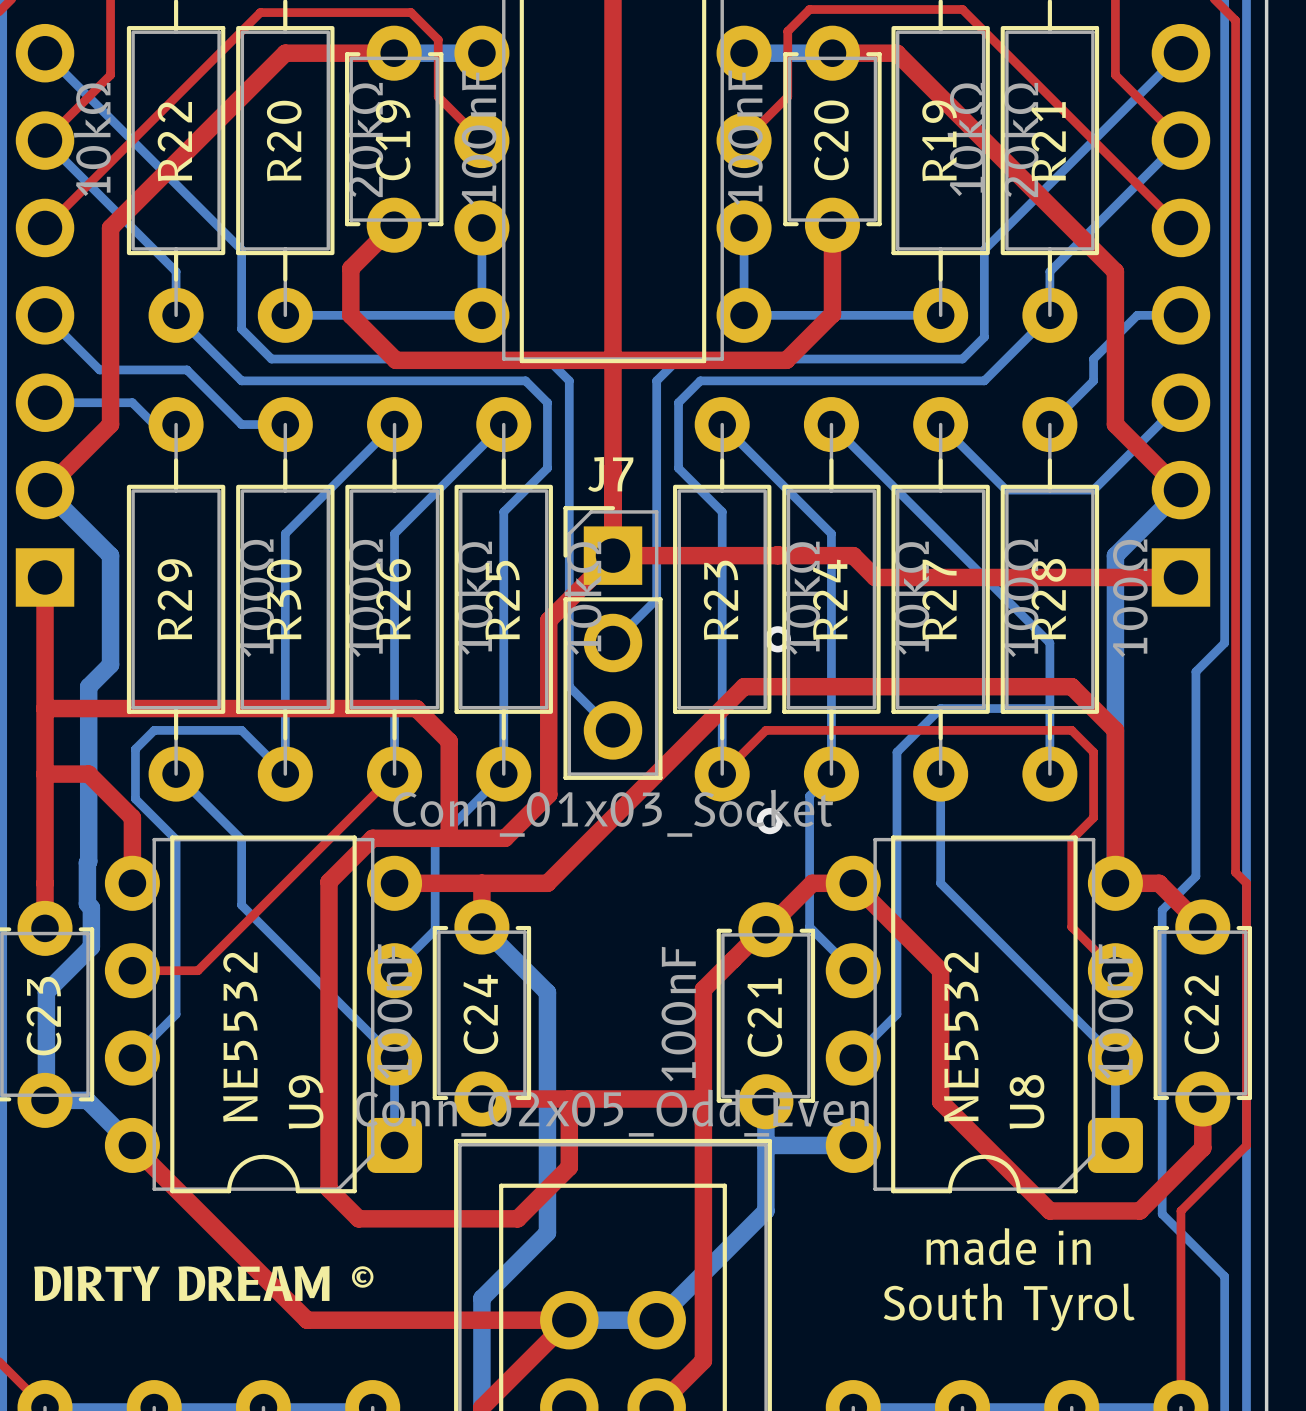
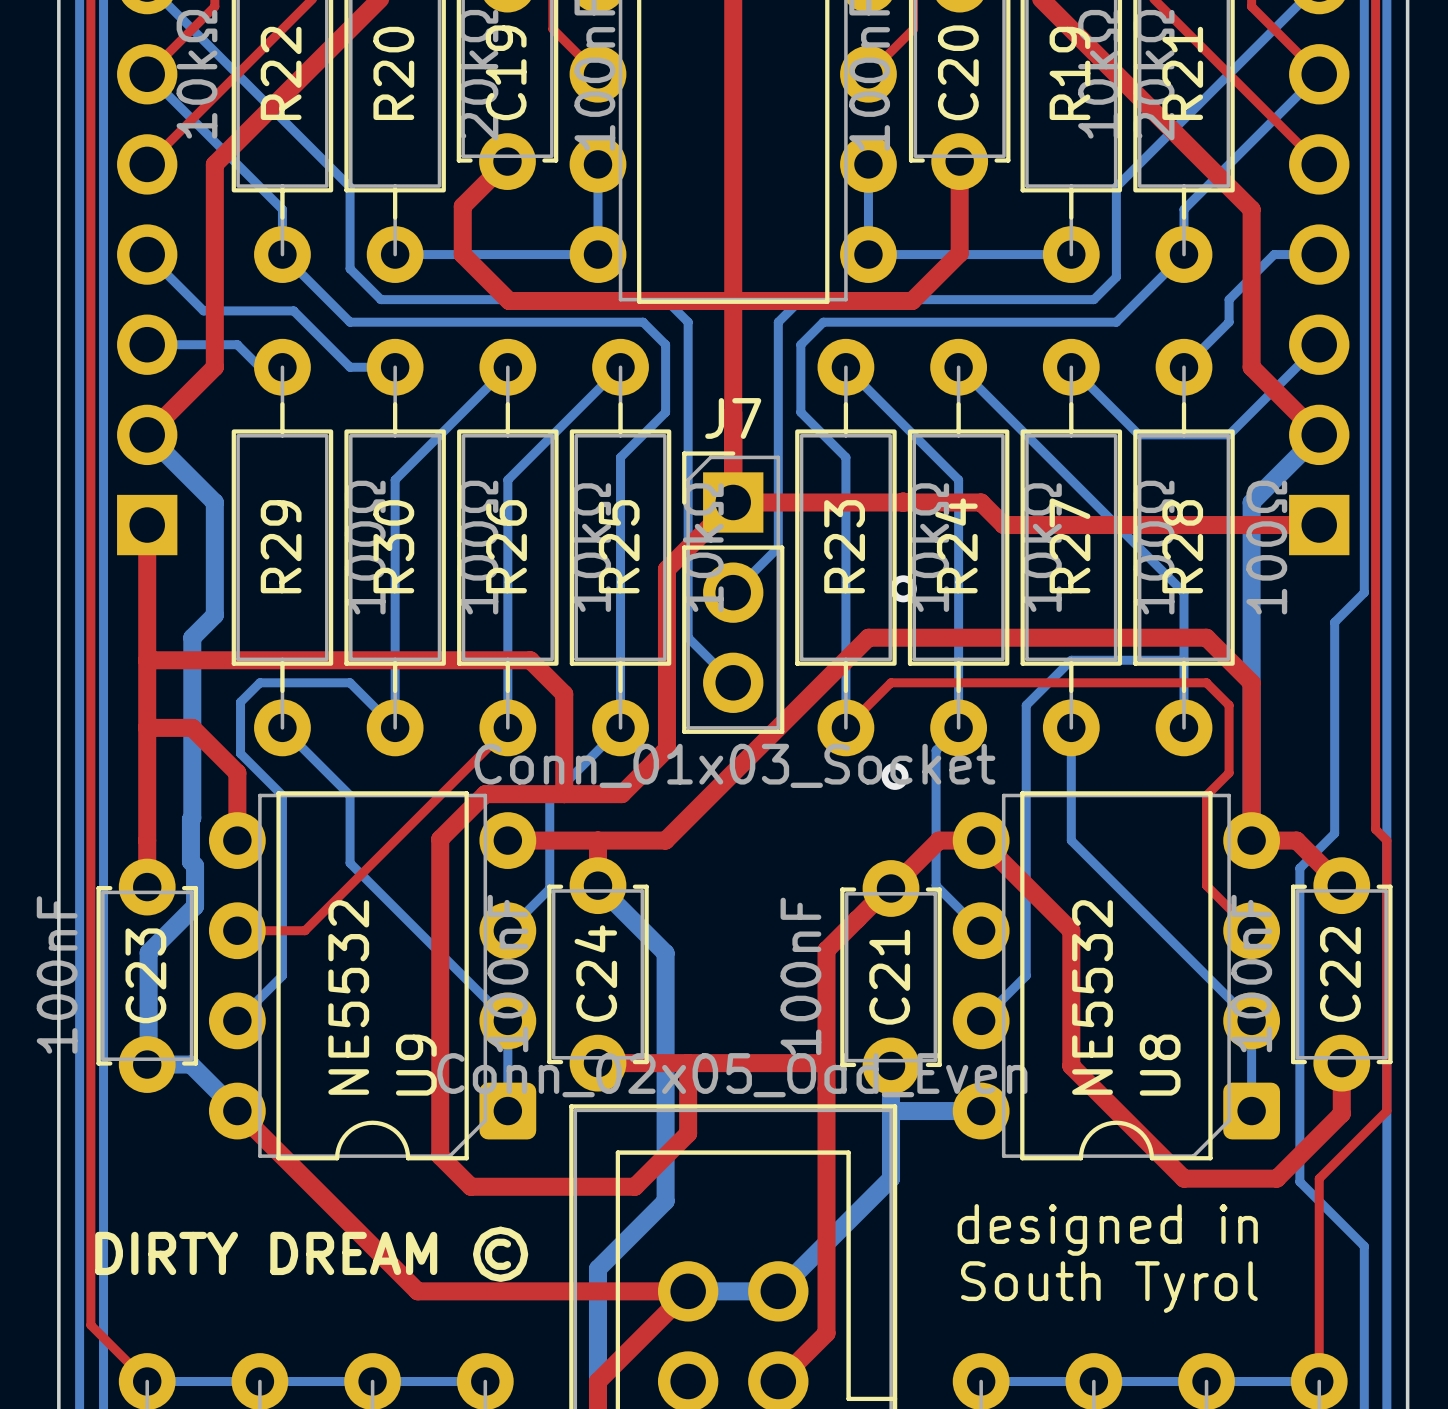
text: made in (1008, 1246) -> designed in (1107, 1229)
text position: South Tyrol (1009, 1307) -> South Tyrol (1109, 1287)

